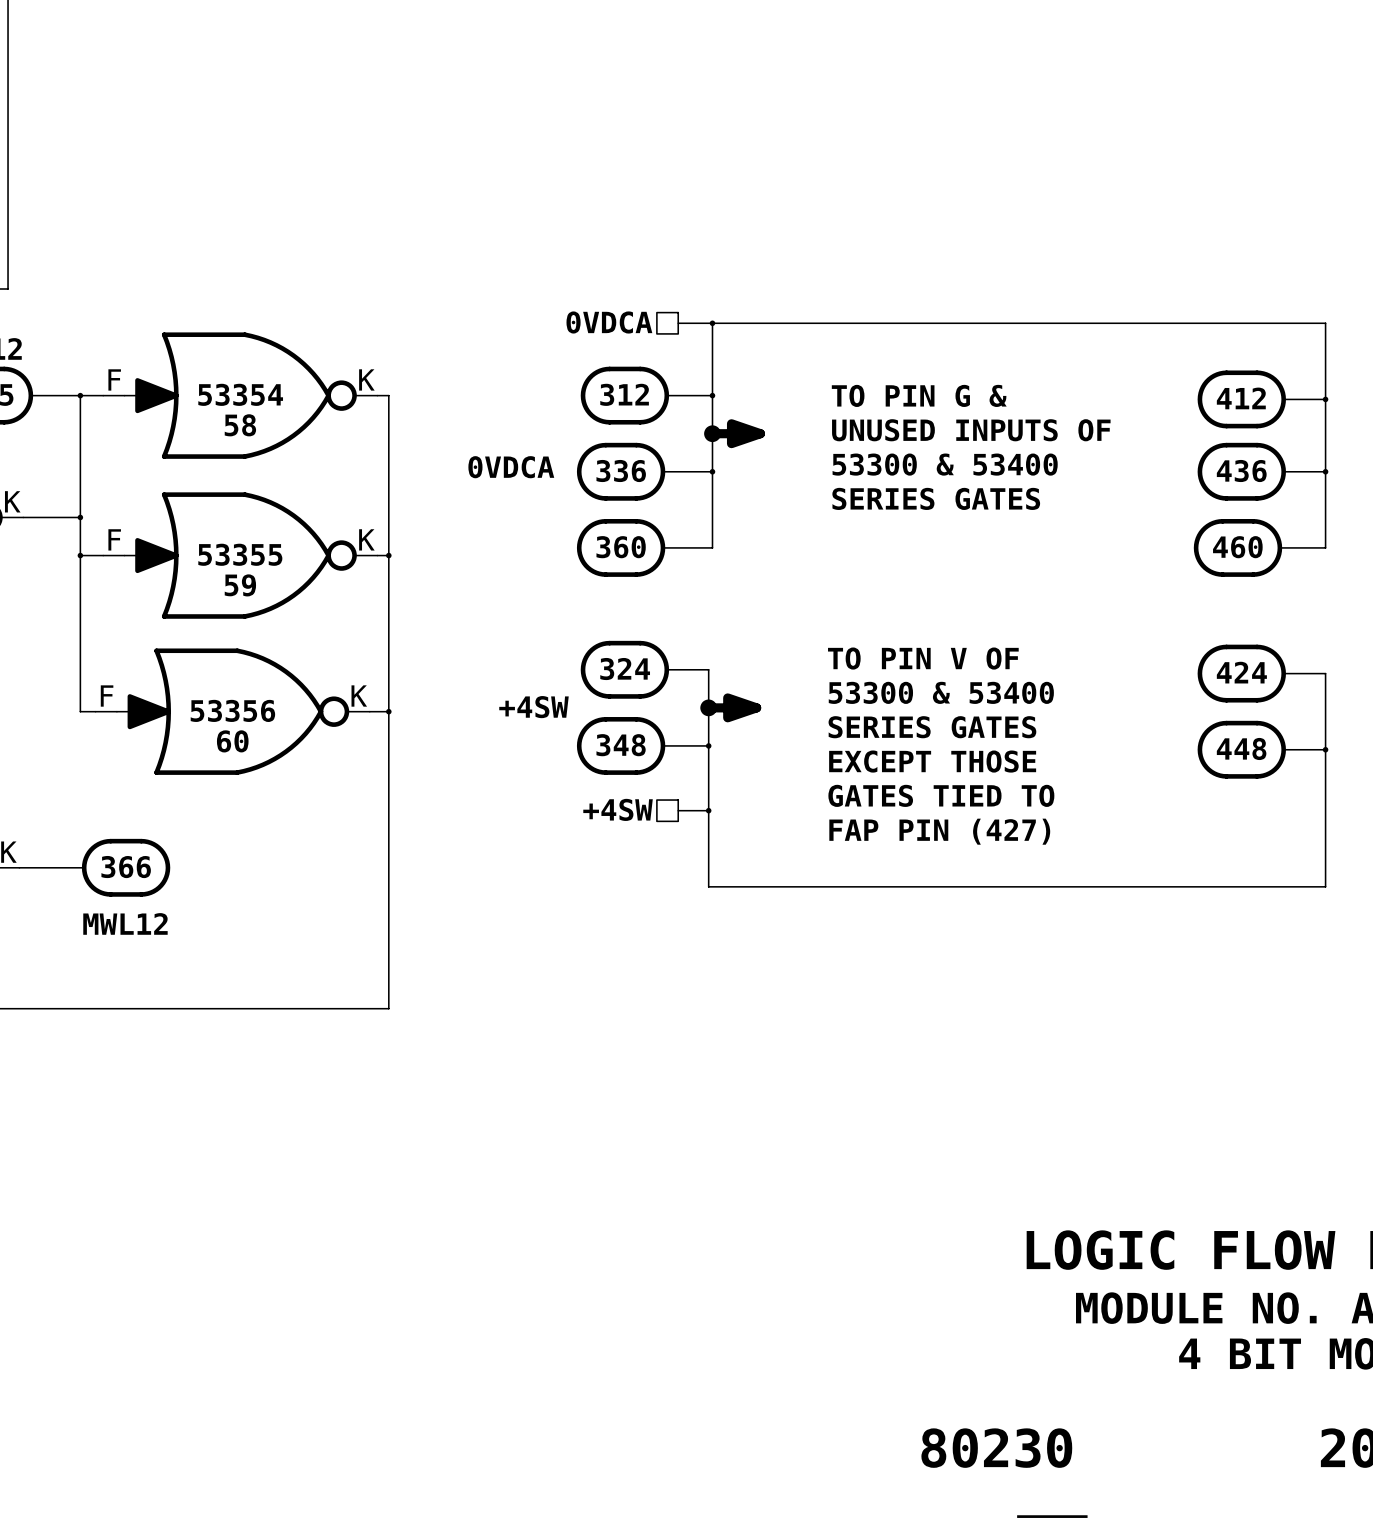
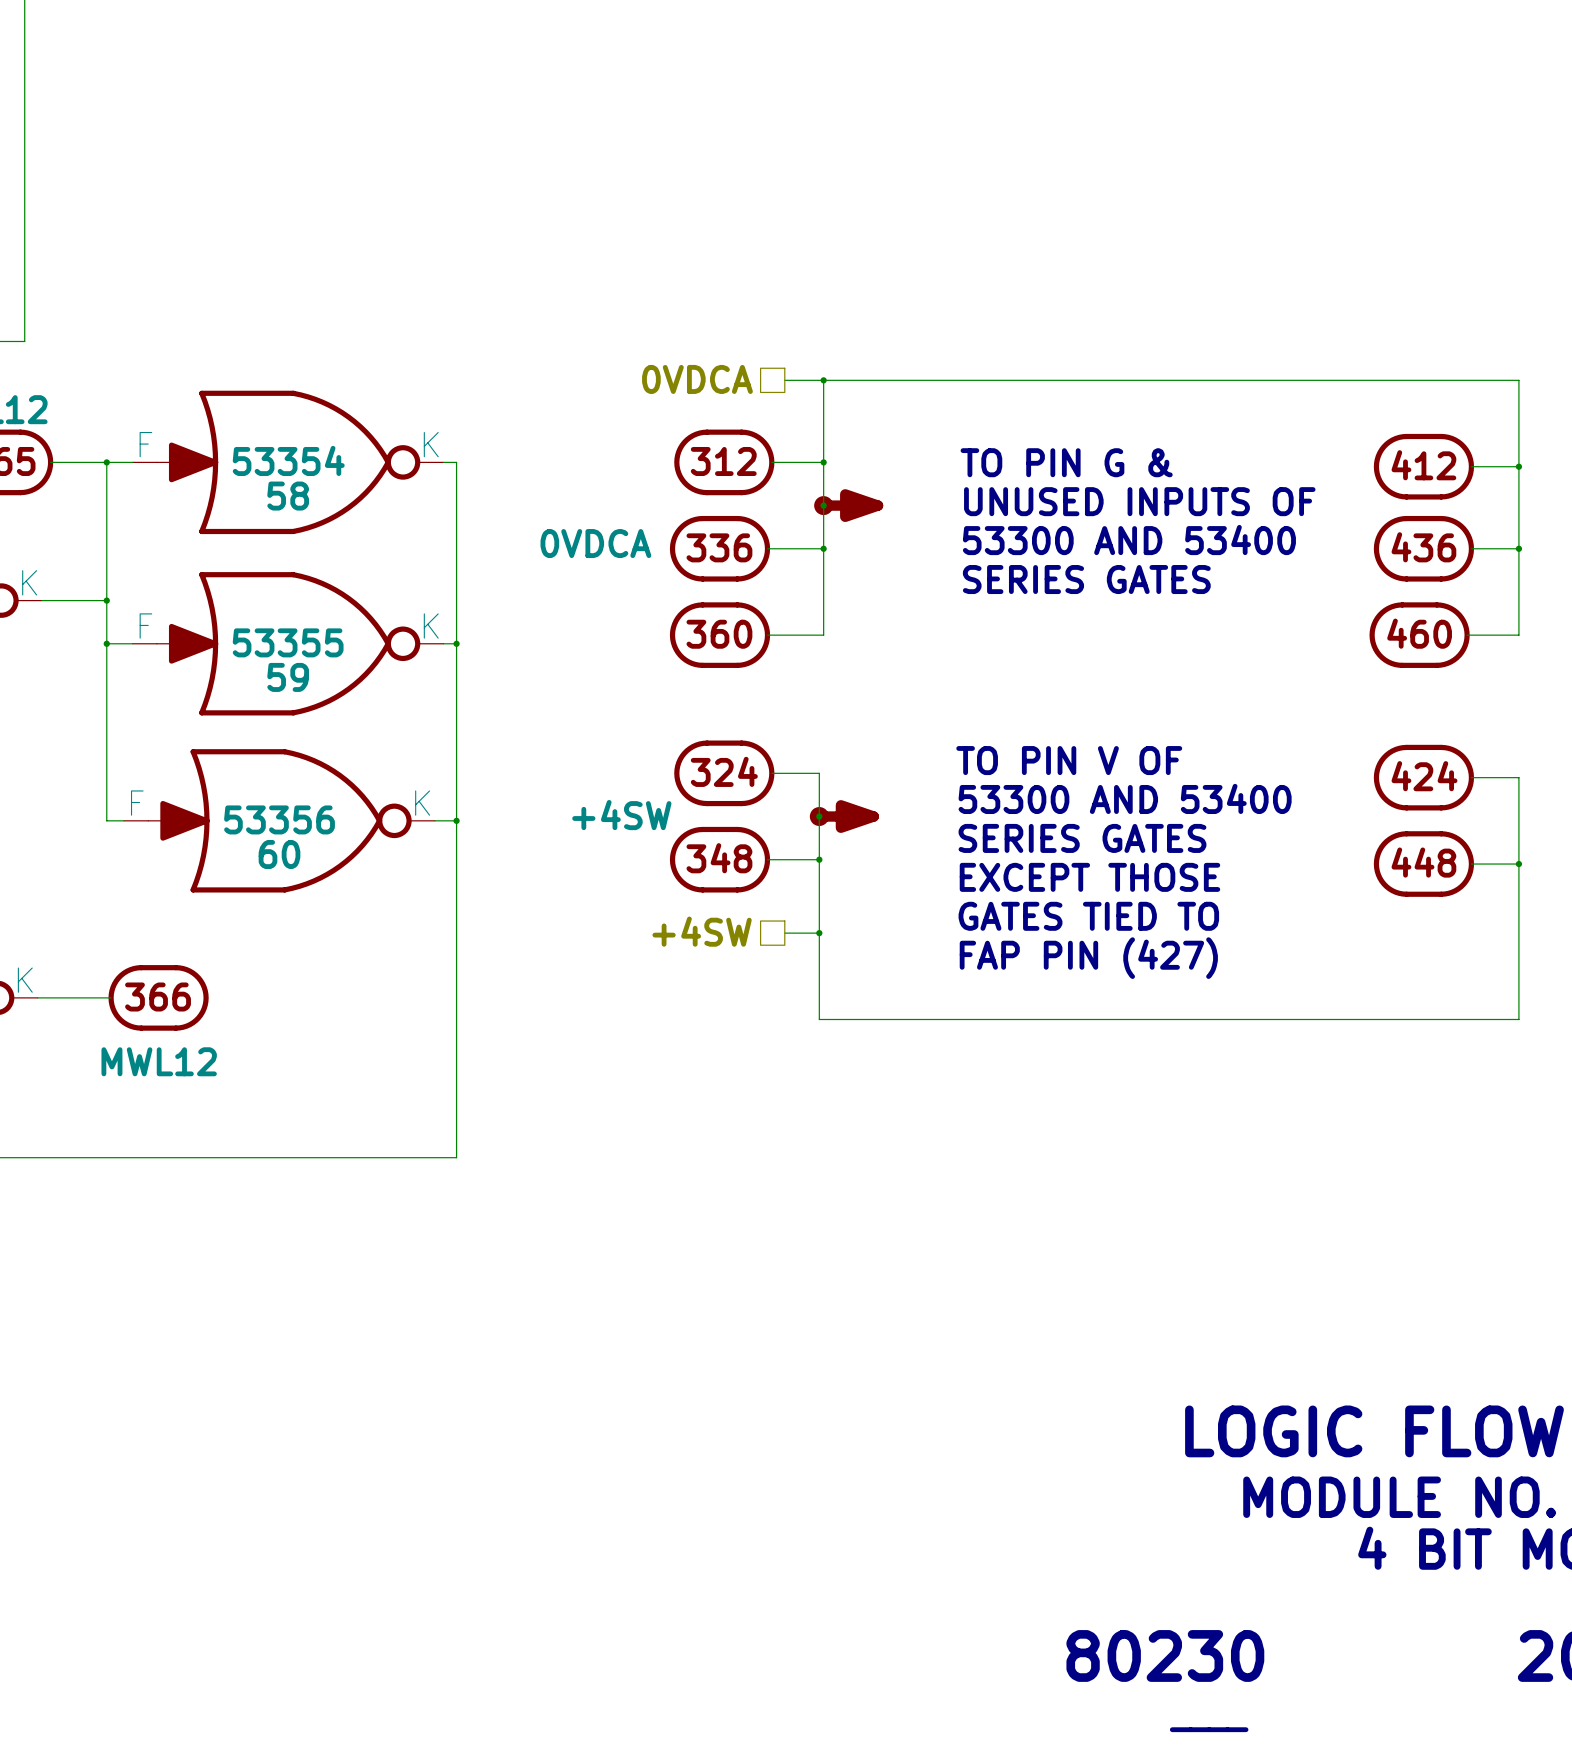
text: 53300 & 53400 (945, 464) -> 53300 AND 53400 (1129, 540)
text: 53300 & 53400 (941, 692) -> 53300 AND 53400 (1125, 798)

